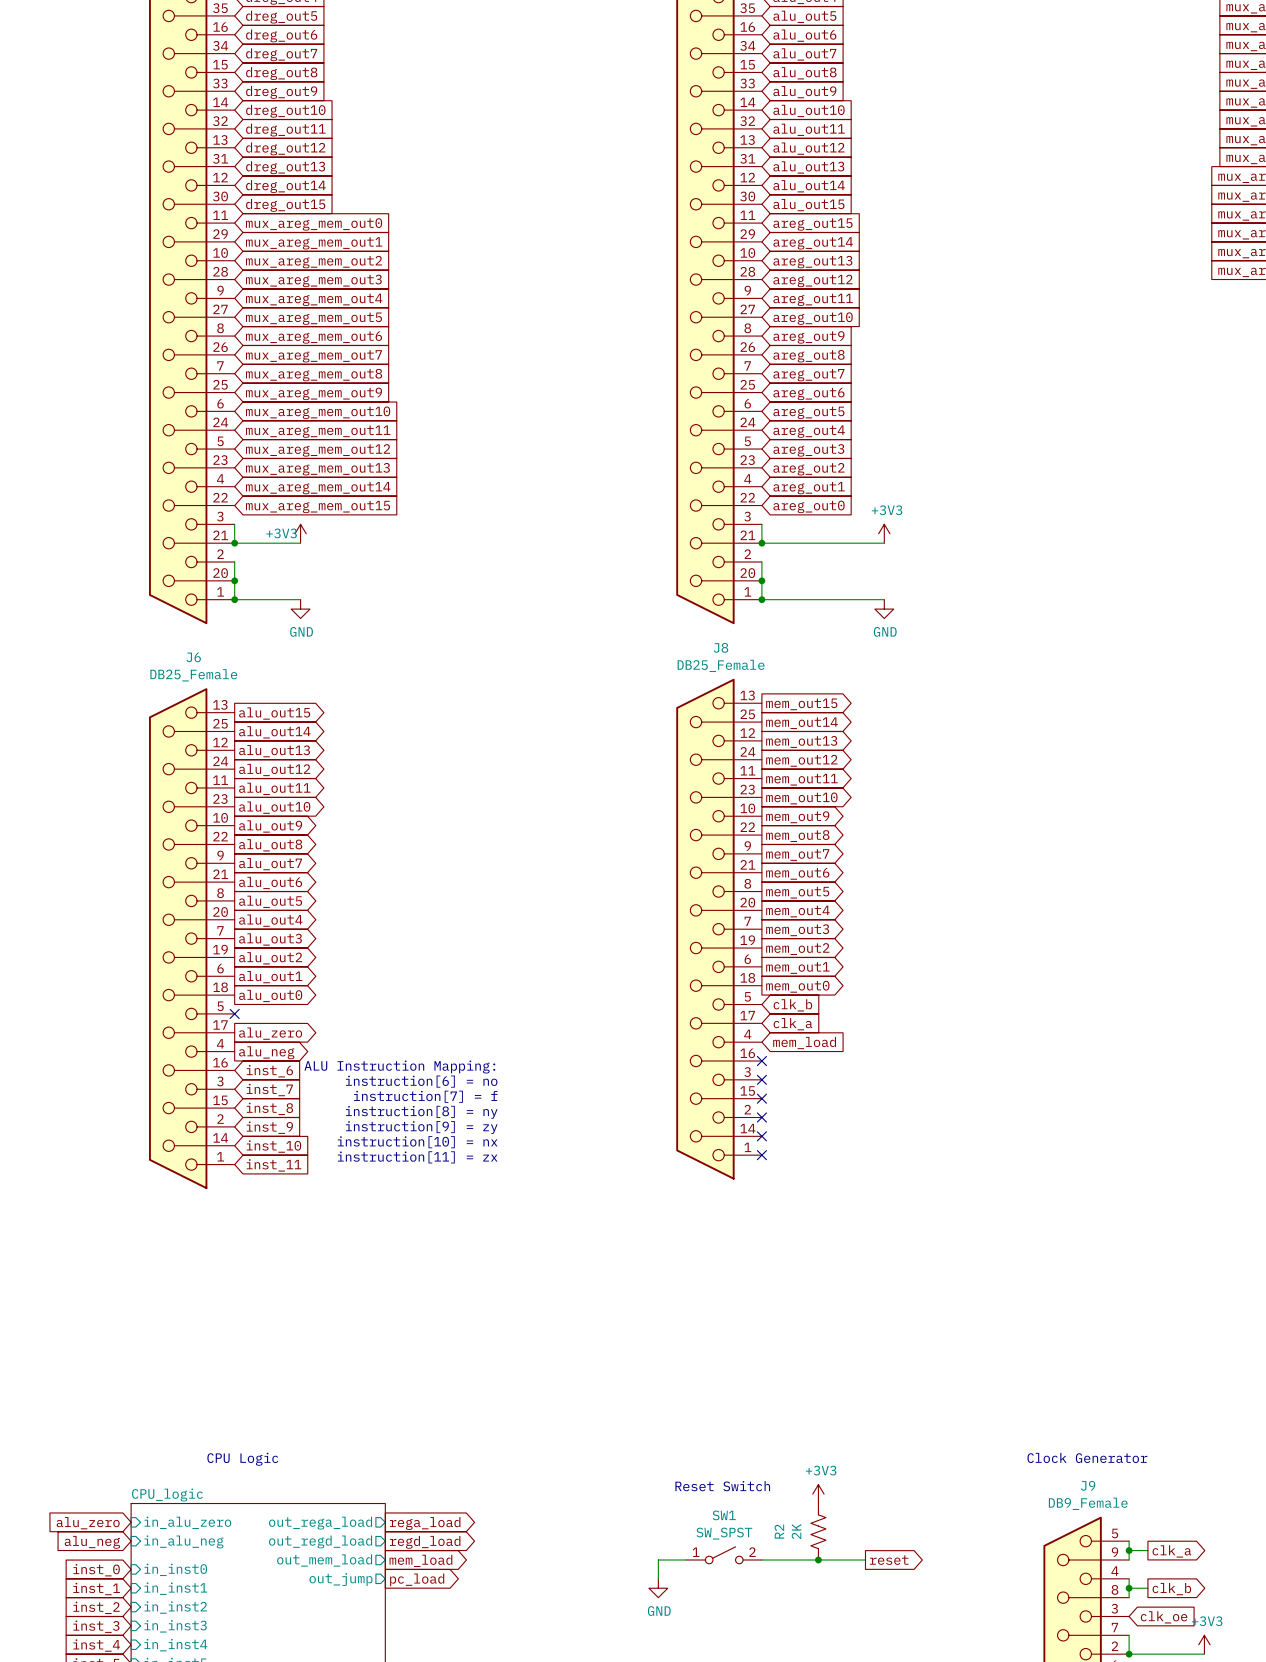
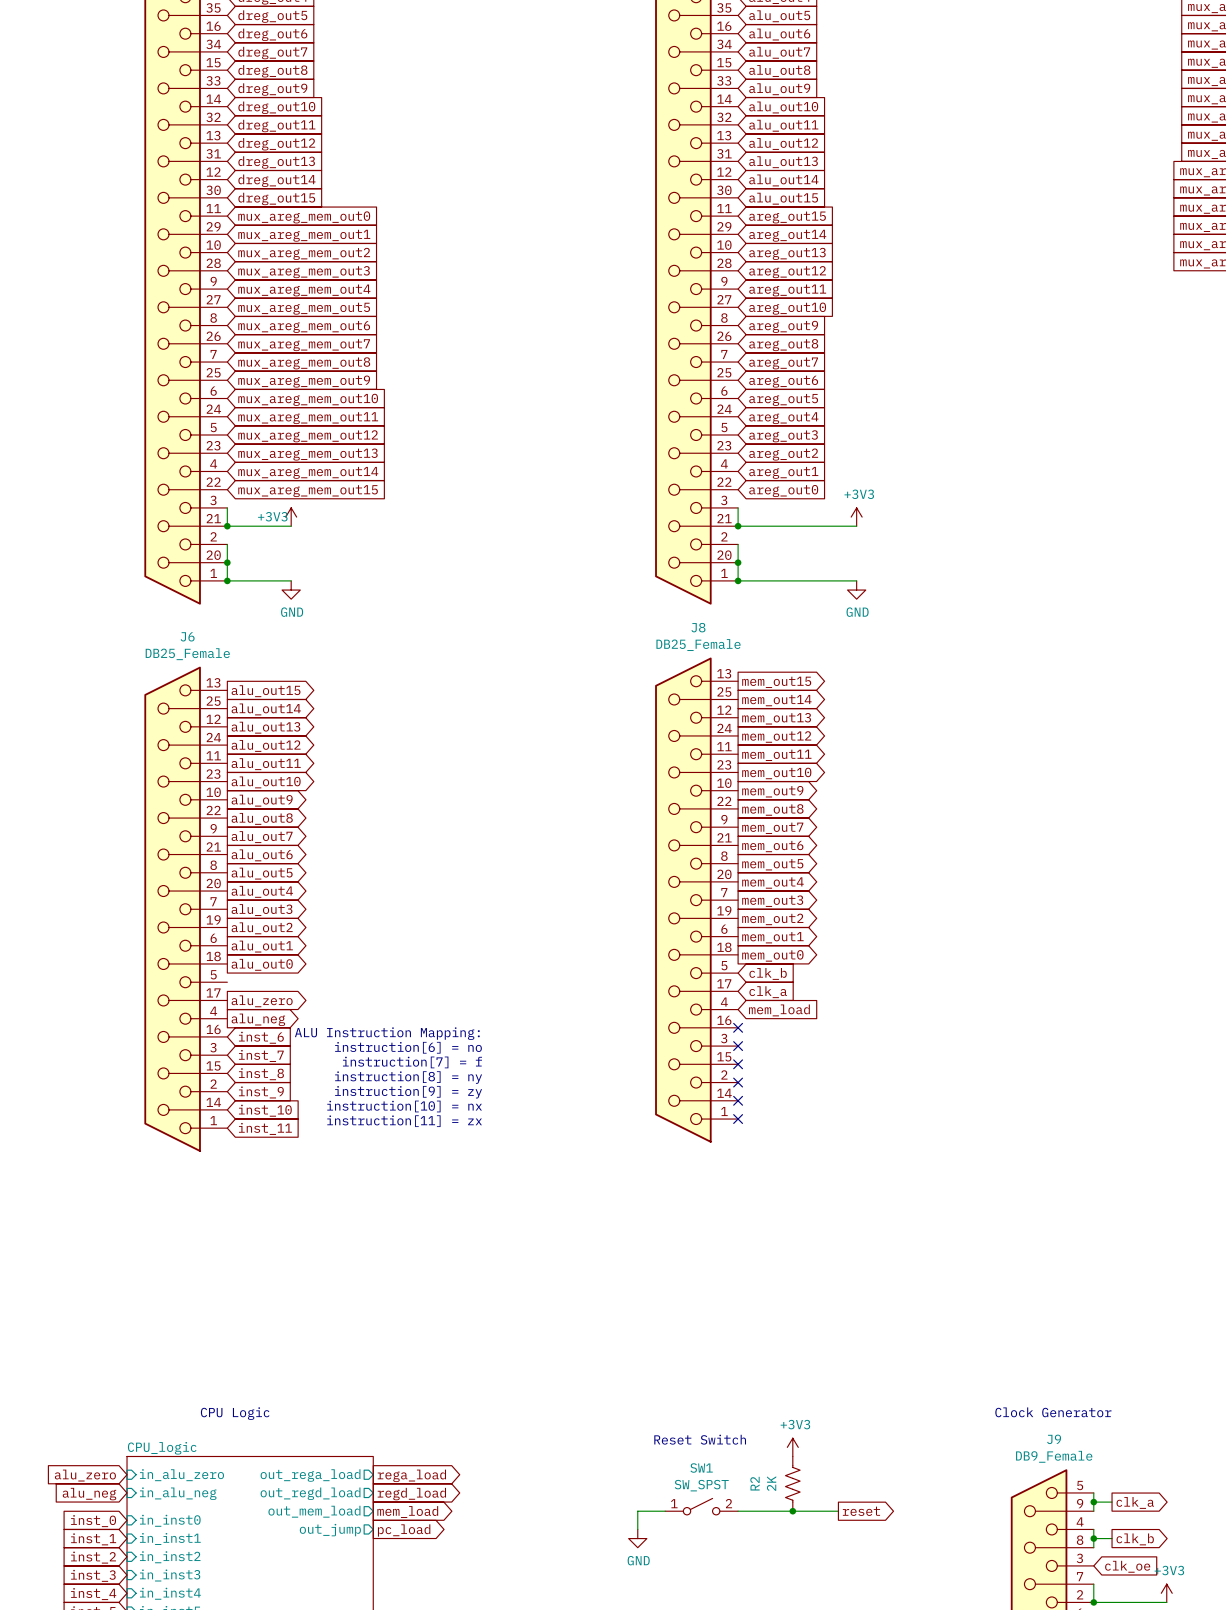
no-connect mark: (234, 1013) -> none

